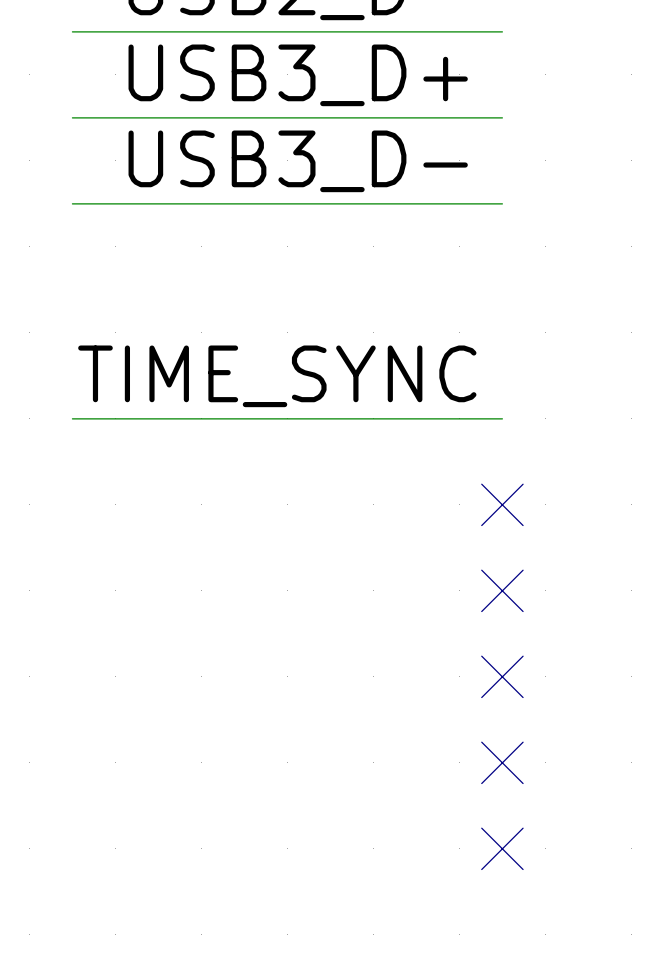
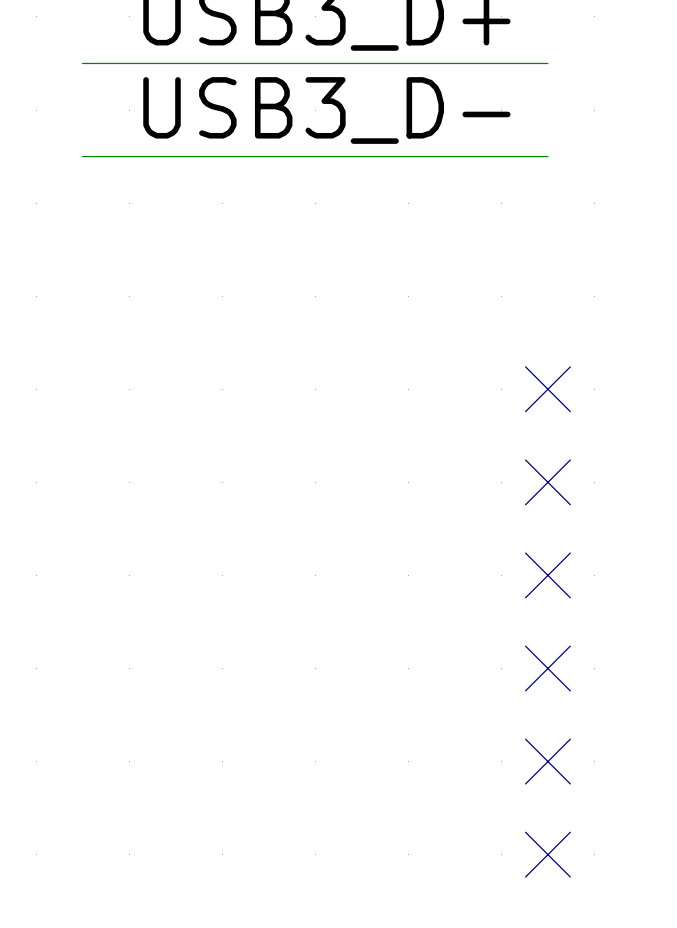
label: TIME_SYNC (277, 376) -> none
wire: (72, 418) (502, 418) -> none
no-connect mark: none -> (547, 389)

